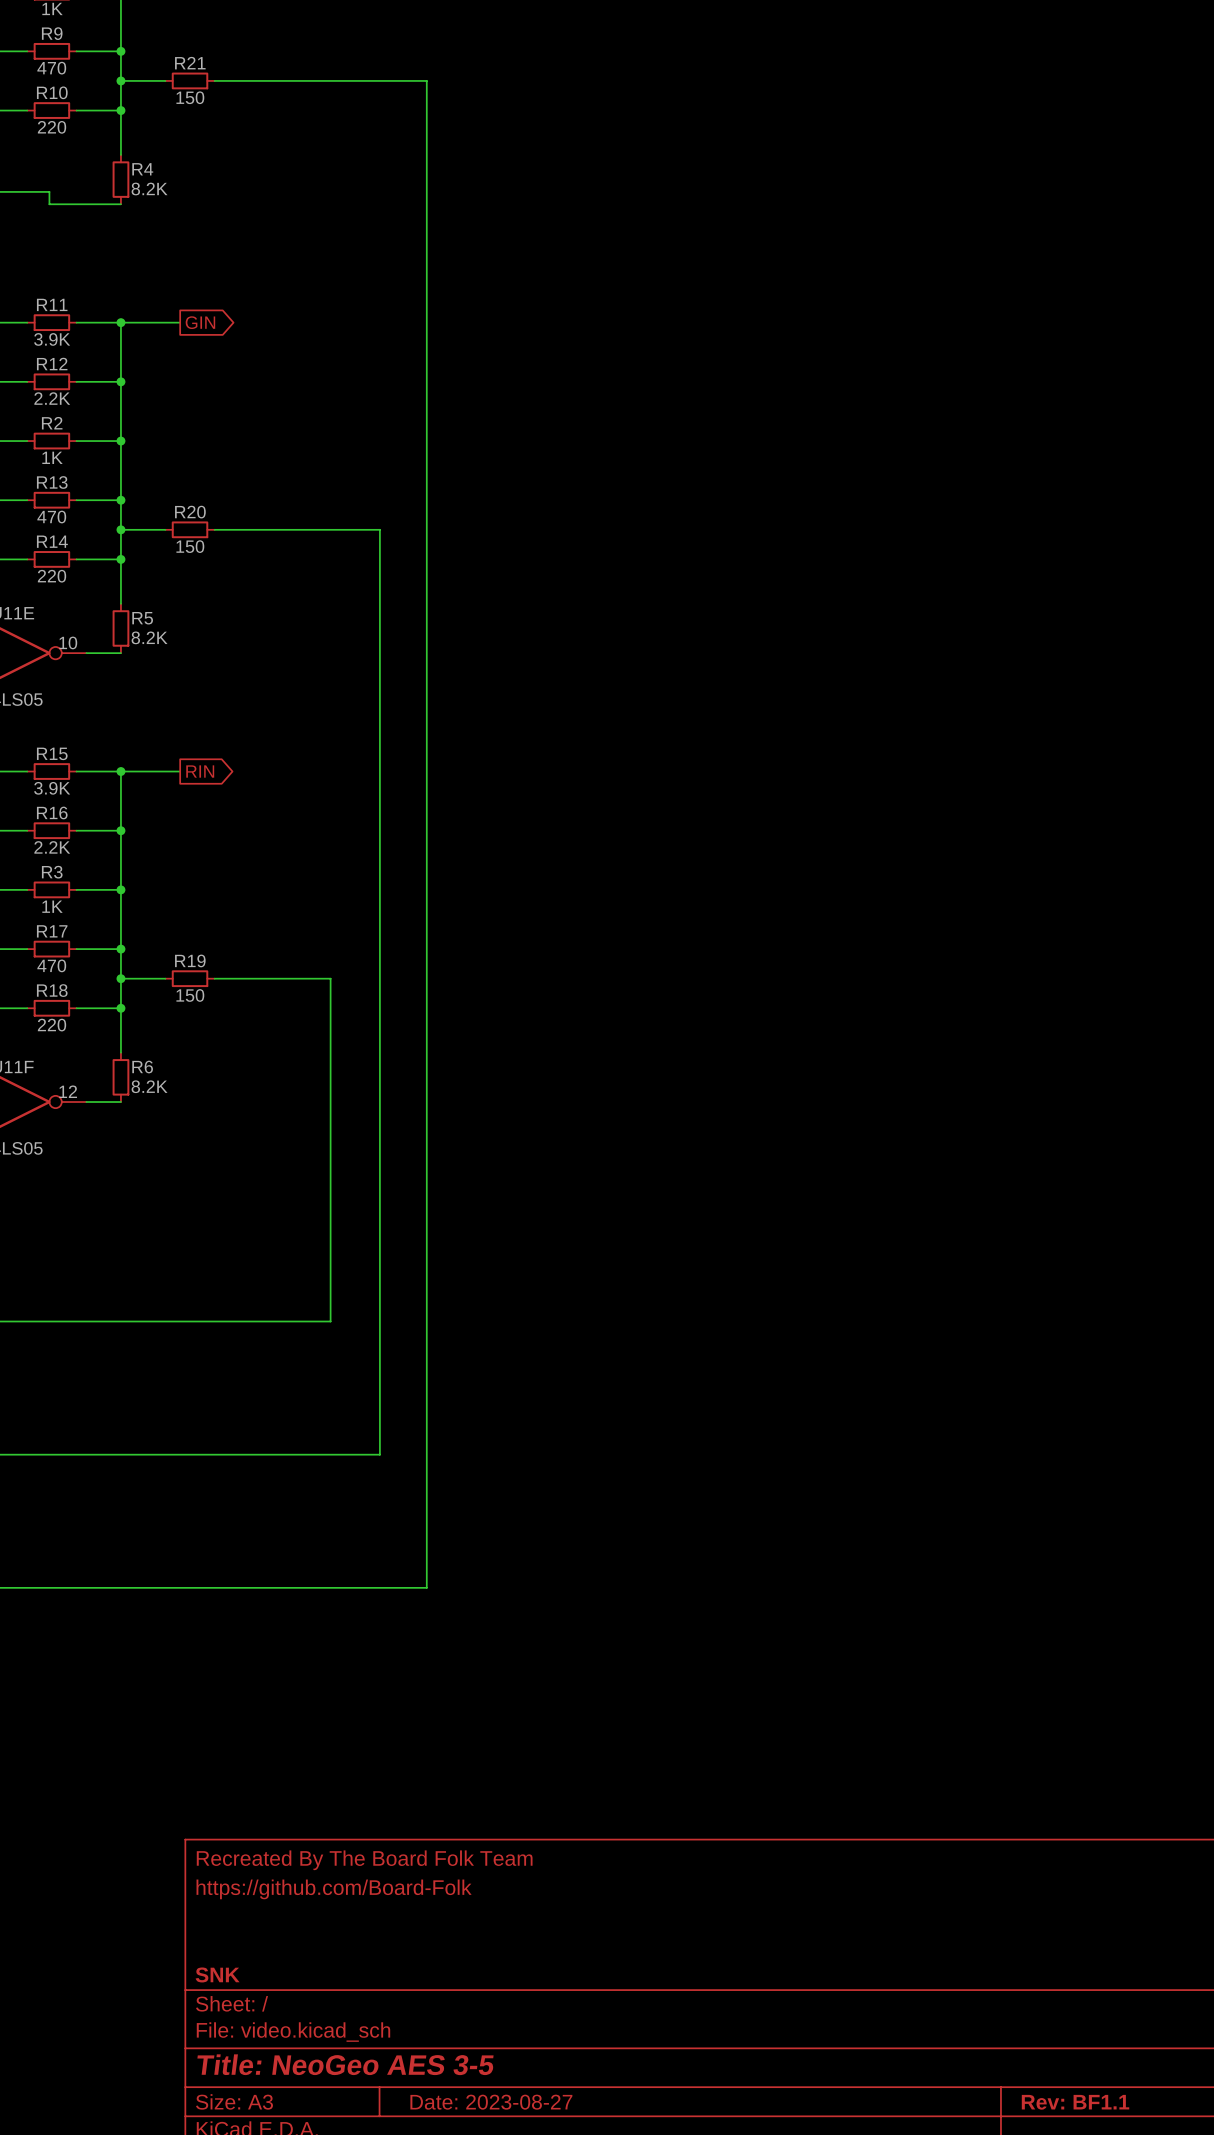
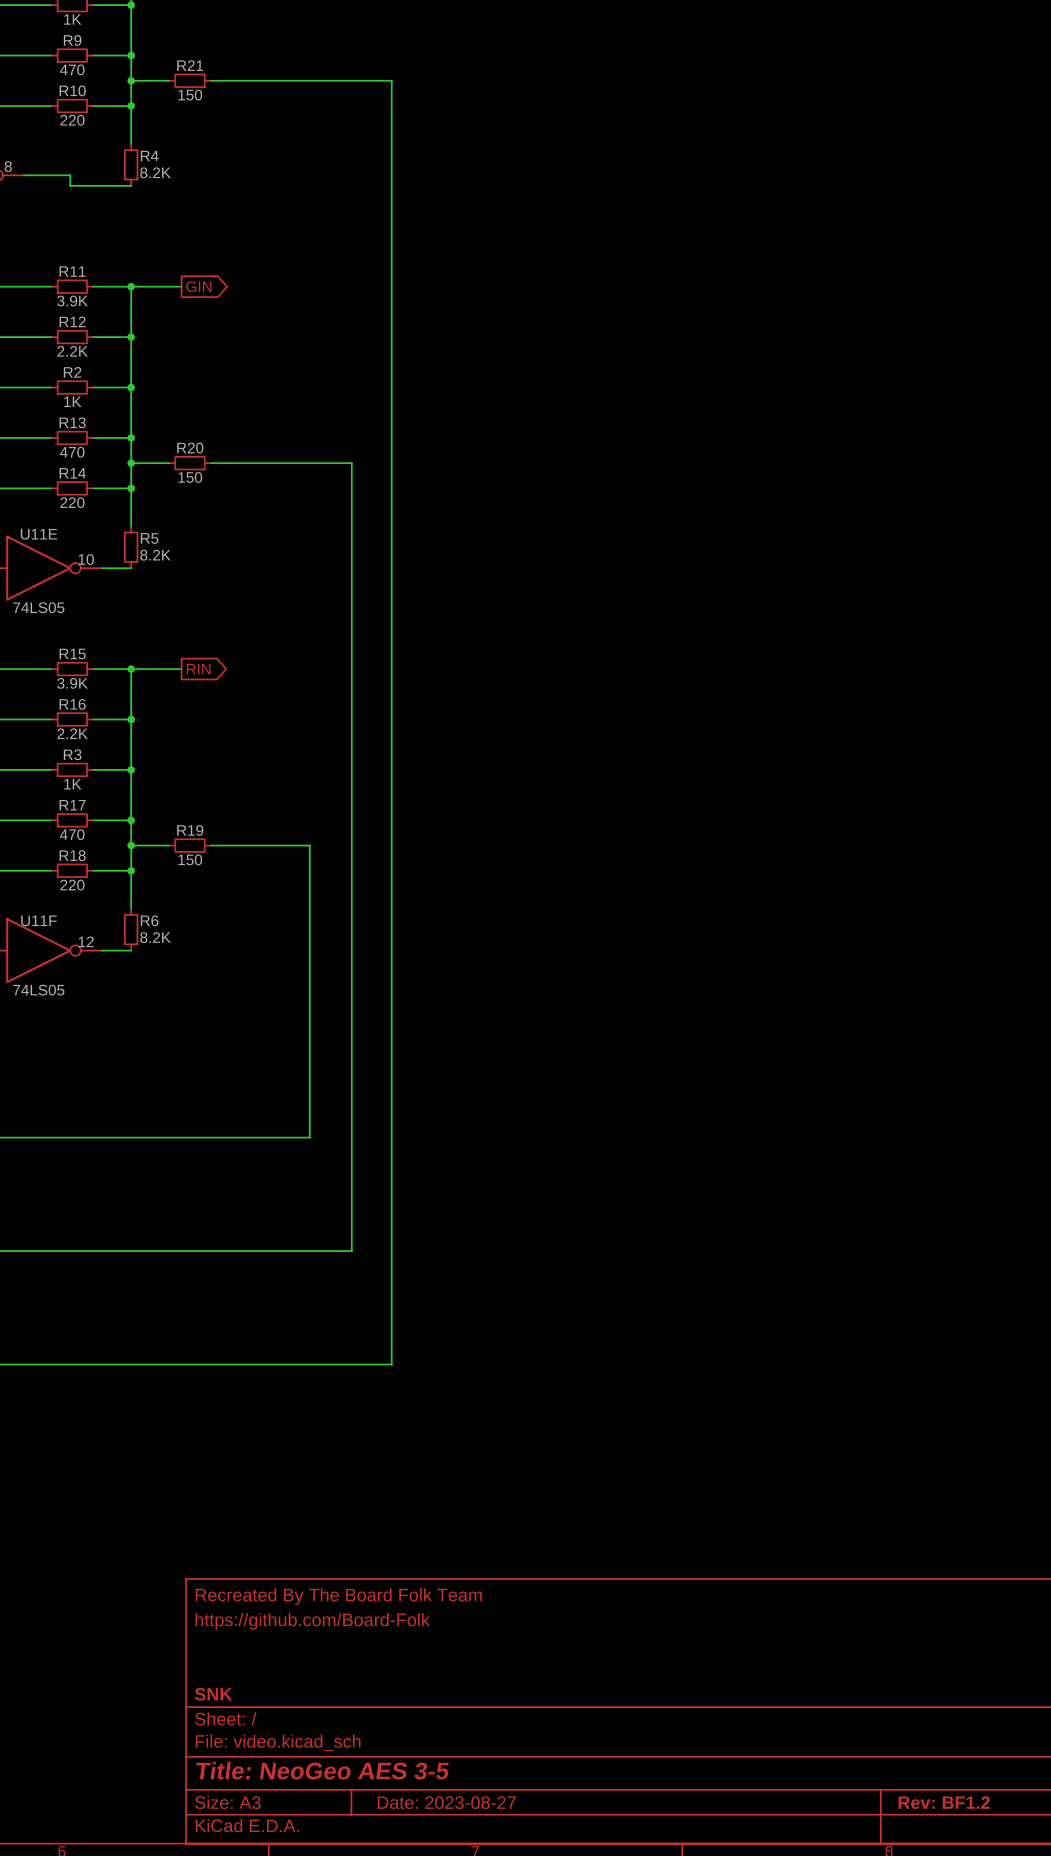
title block: Rev: BF1.1 (1075, 2102) -> Rev: BF1.2 (944, 1802)

